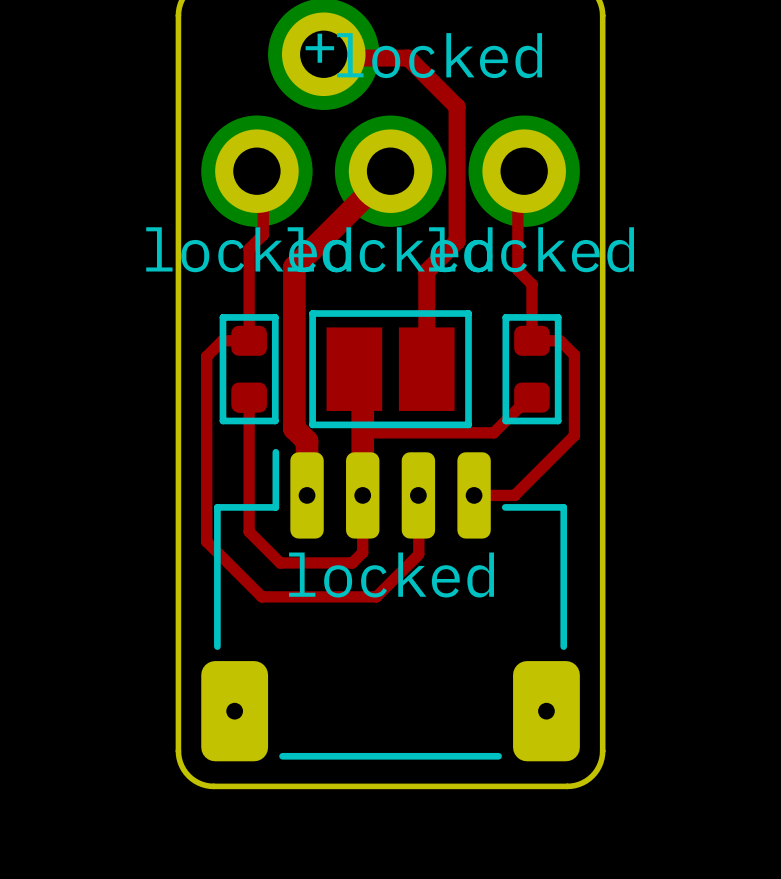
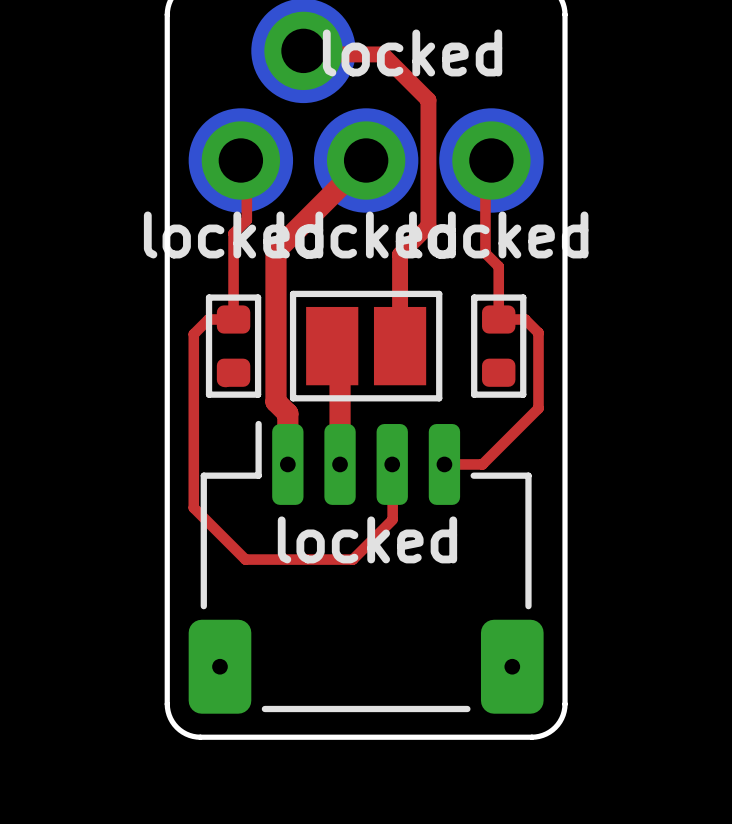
text: + (319, 48) -> none
top track: (249, 397) (249, 531) (280, 562) (352, 562) (362, 552) (362, 495) -> none
top track: (531, 397) (529, 397) (493, 432) (362, 432) -> none

